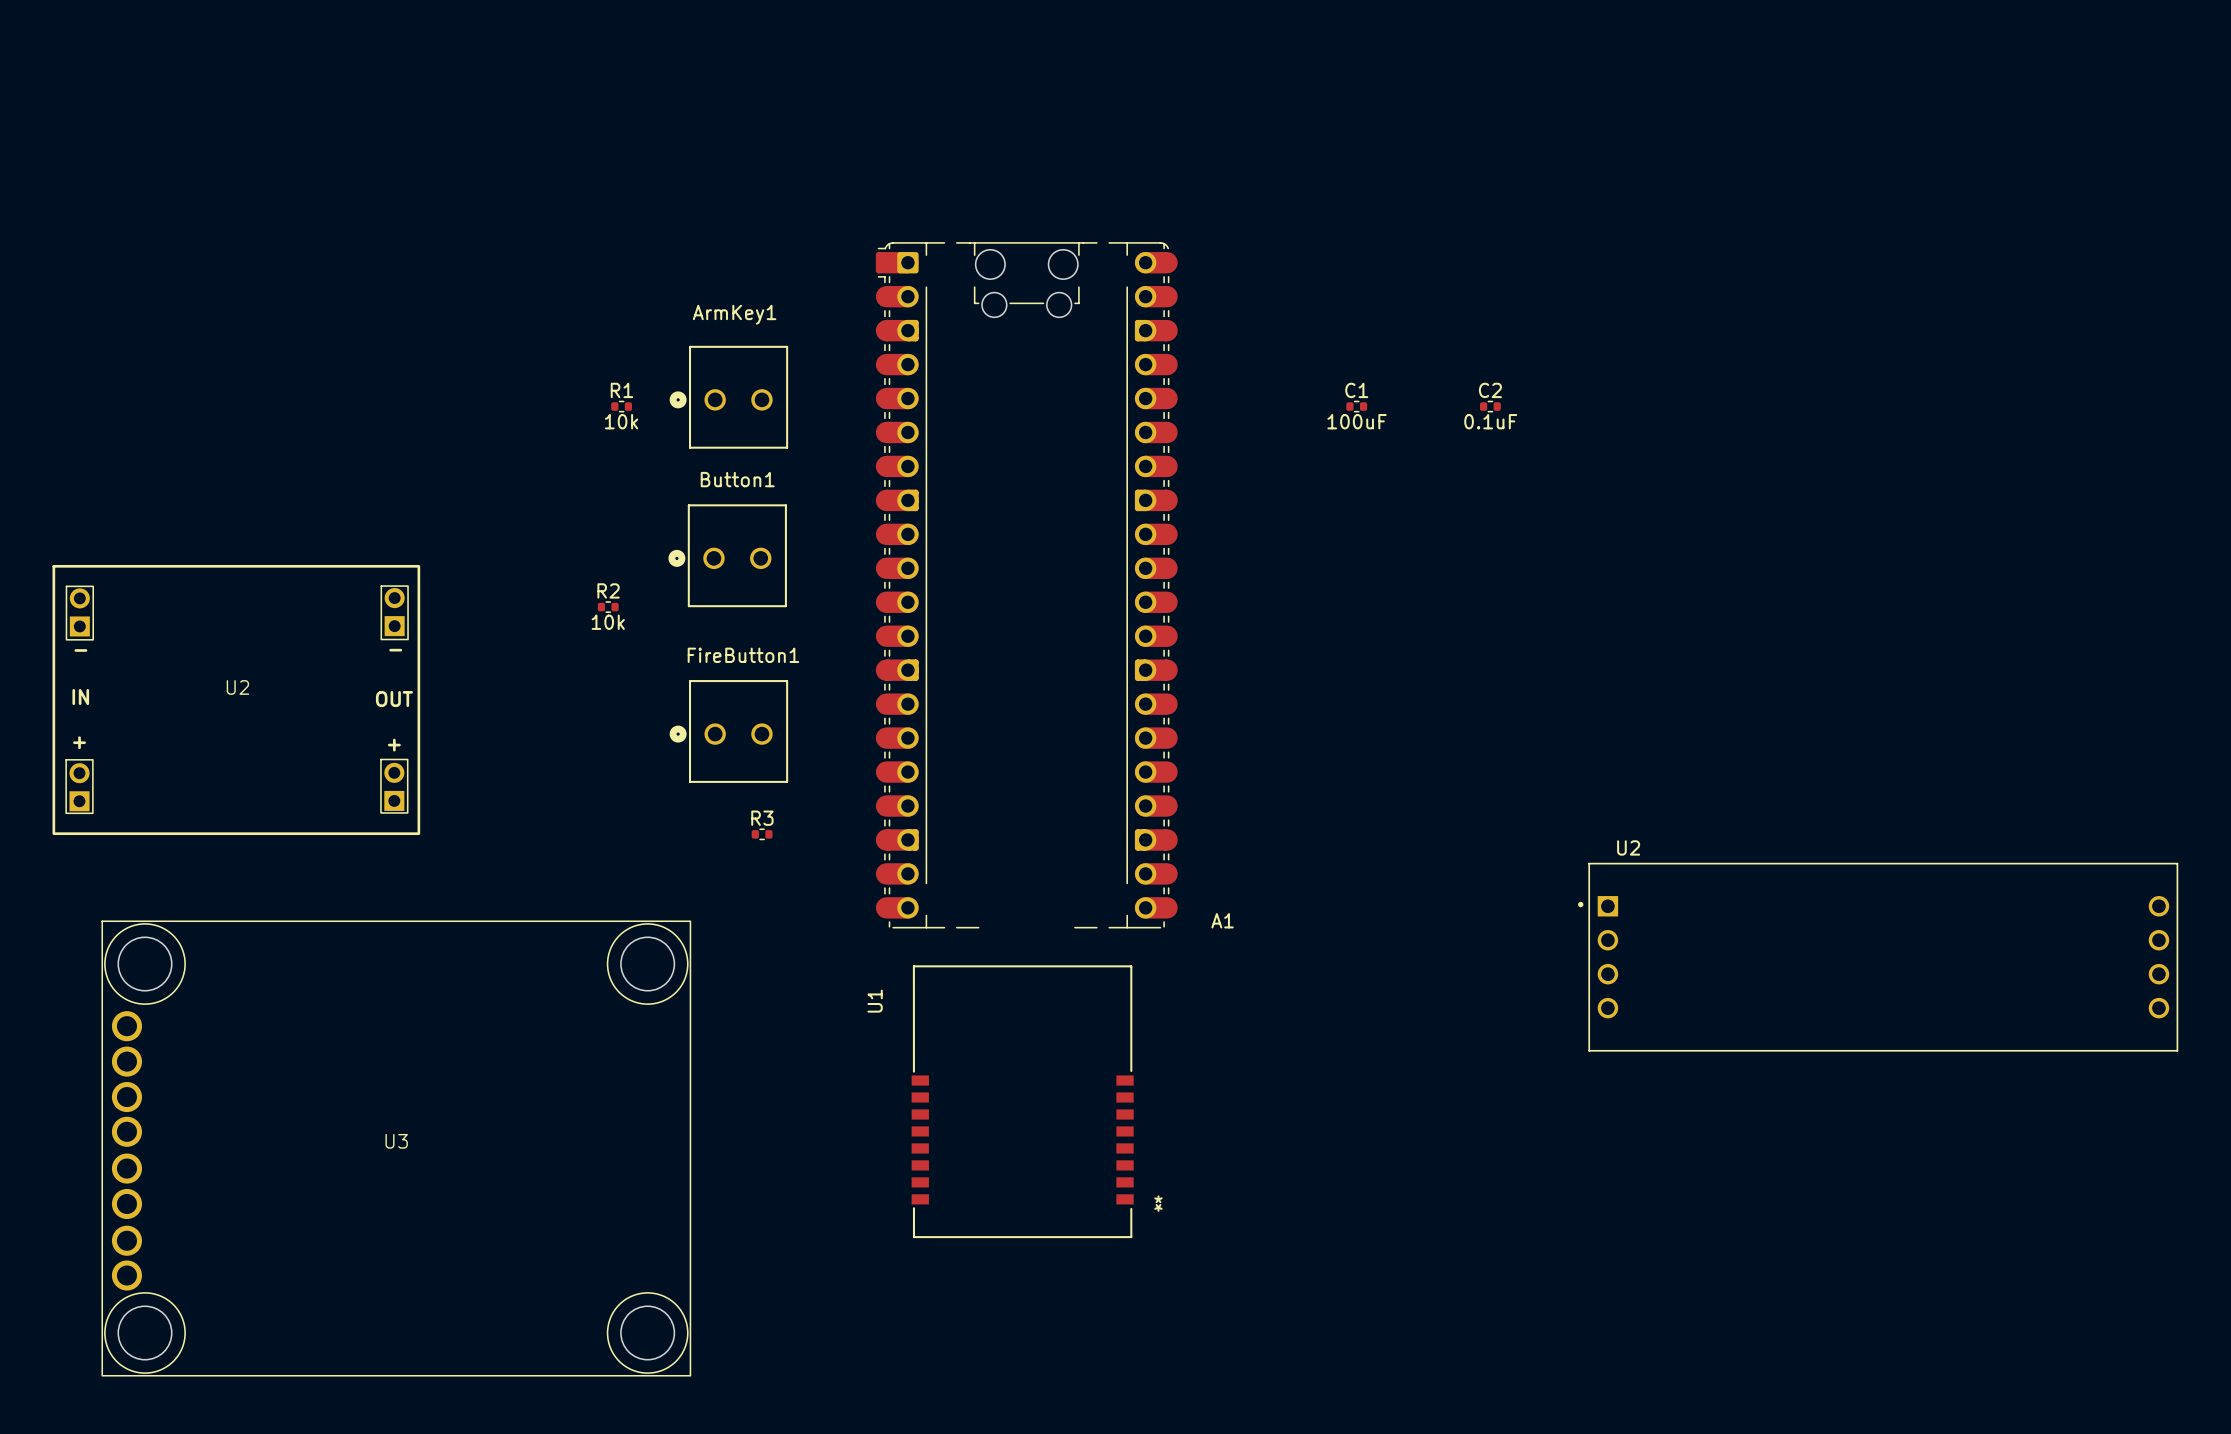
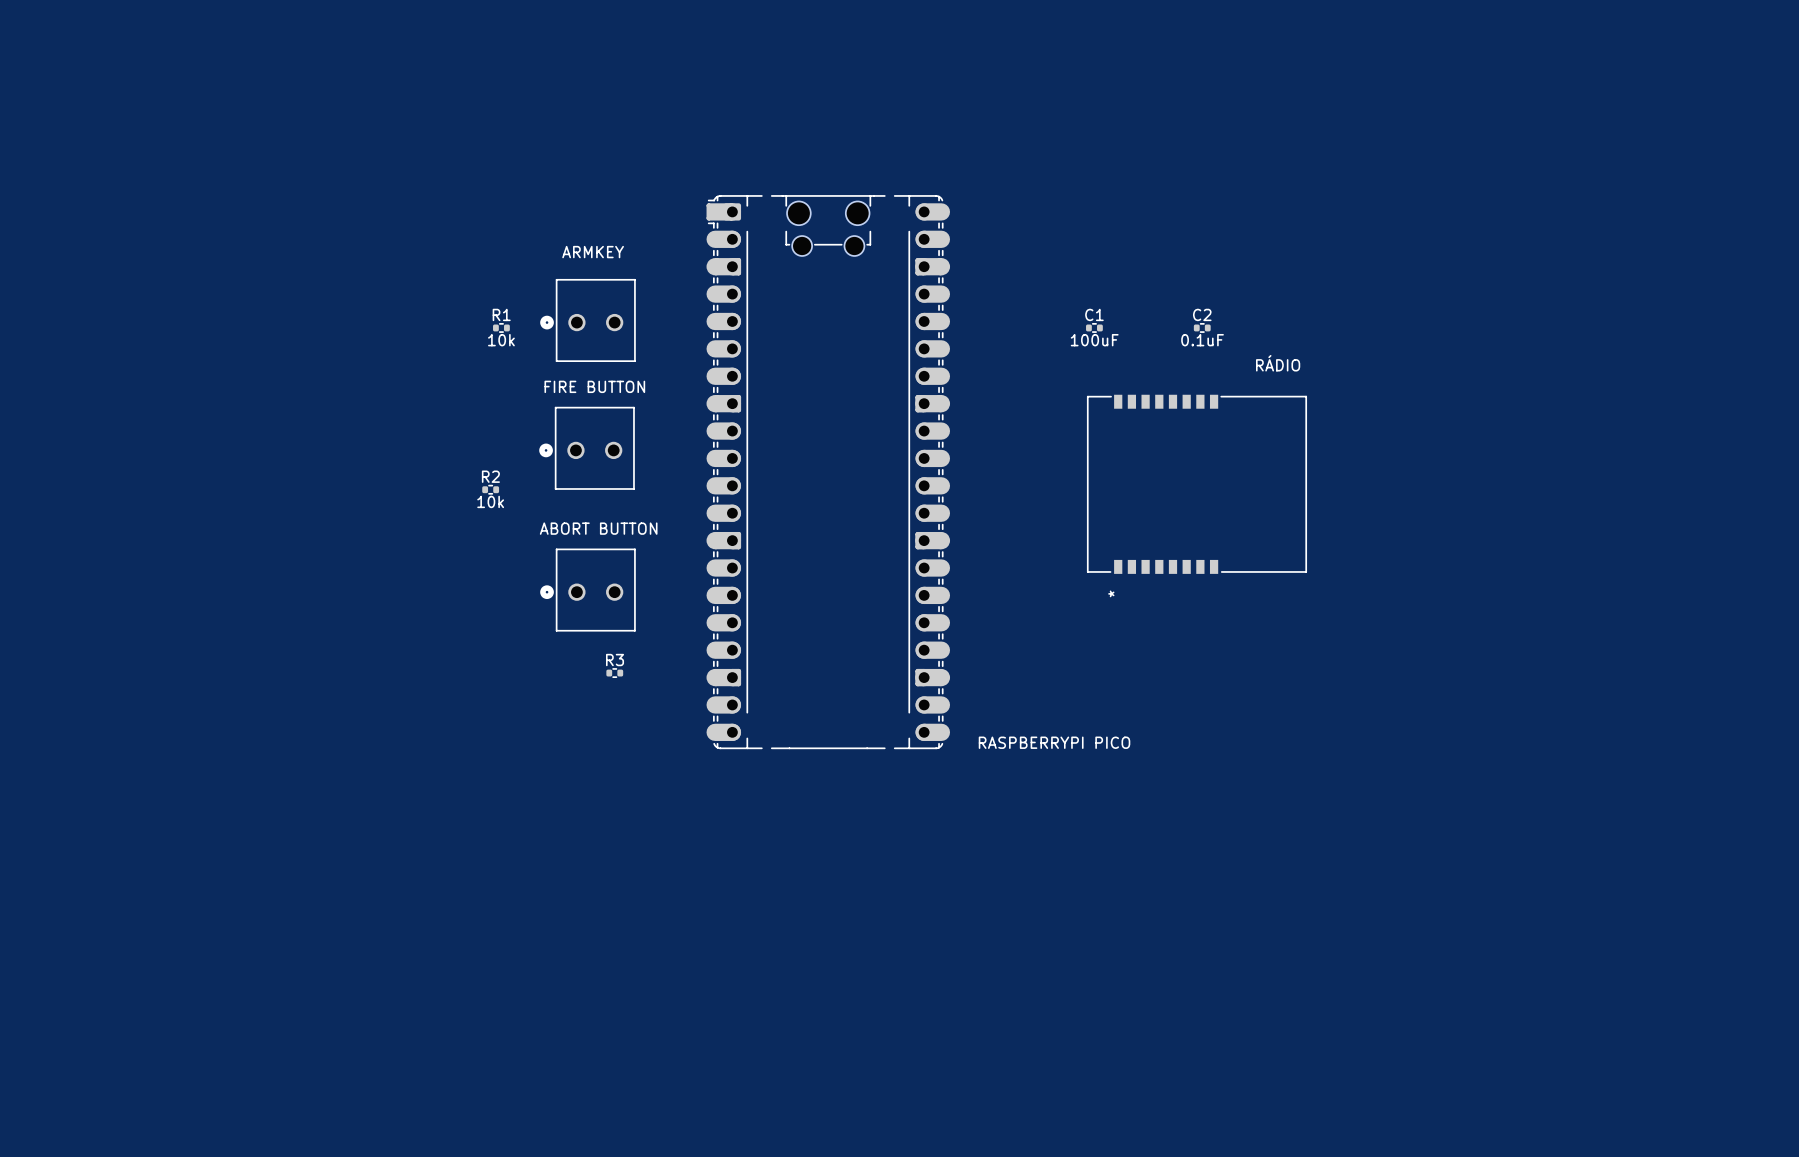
ArmKey1 name: ArmKey1 (734, 314) -> ARMKEY (593, 252)
Button1 name: Button1 (737, 479) -> FIRE BUTTON (594, 386)
A1: (1026, 585) -> none
RASPBERRYPI PICO: none -> (828, 472)
RÁDIO: none -> (1196, 484)
FireButton1 name: FireButton1 (743, 655) -> ABORT BUTTON (598, 528)
U2: (236, 699) -> none
U2: (1878, 957) -> none
U1: (1022, 1101) -> none
U3: (396, 1148) -> none

